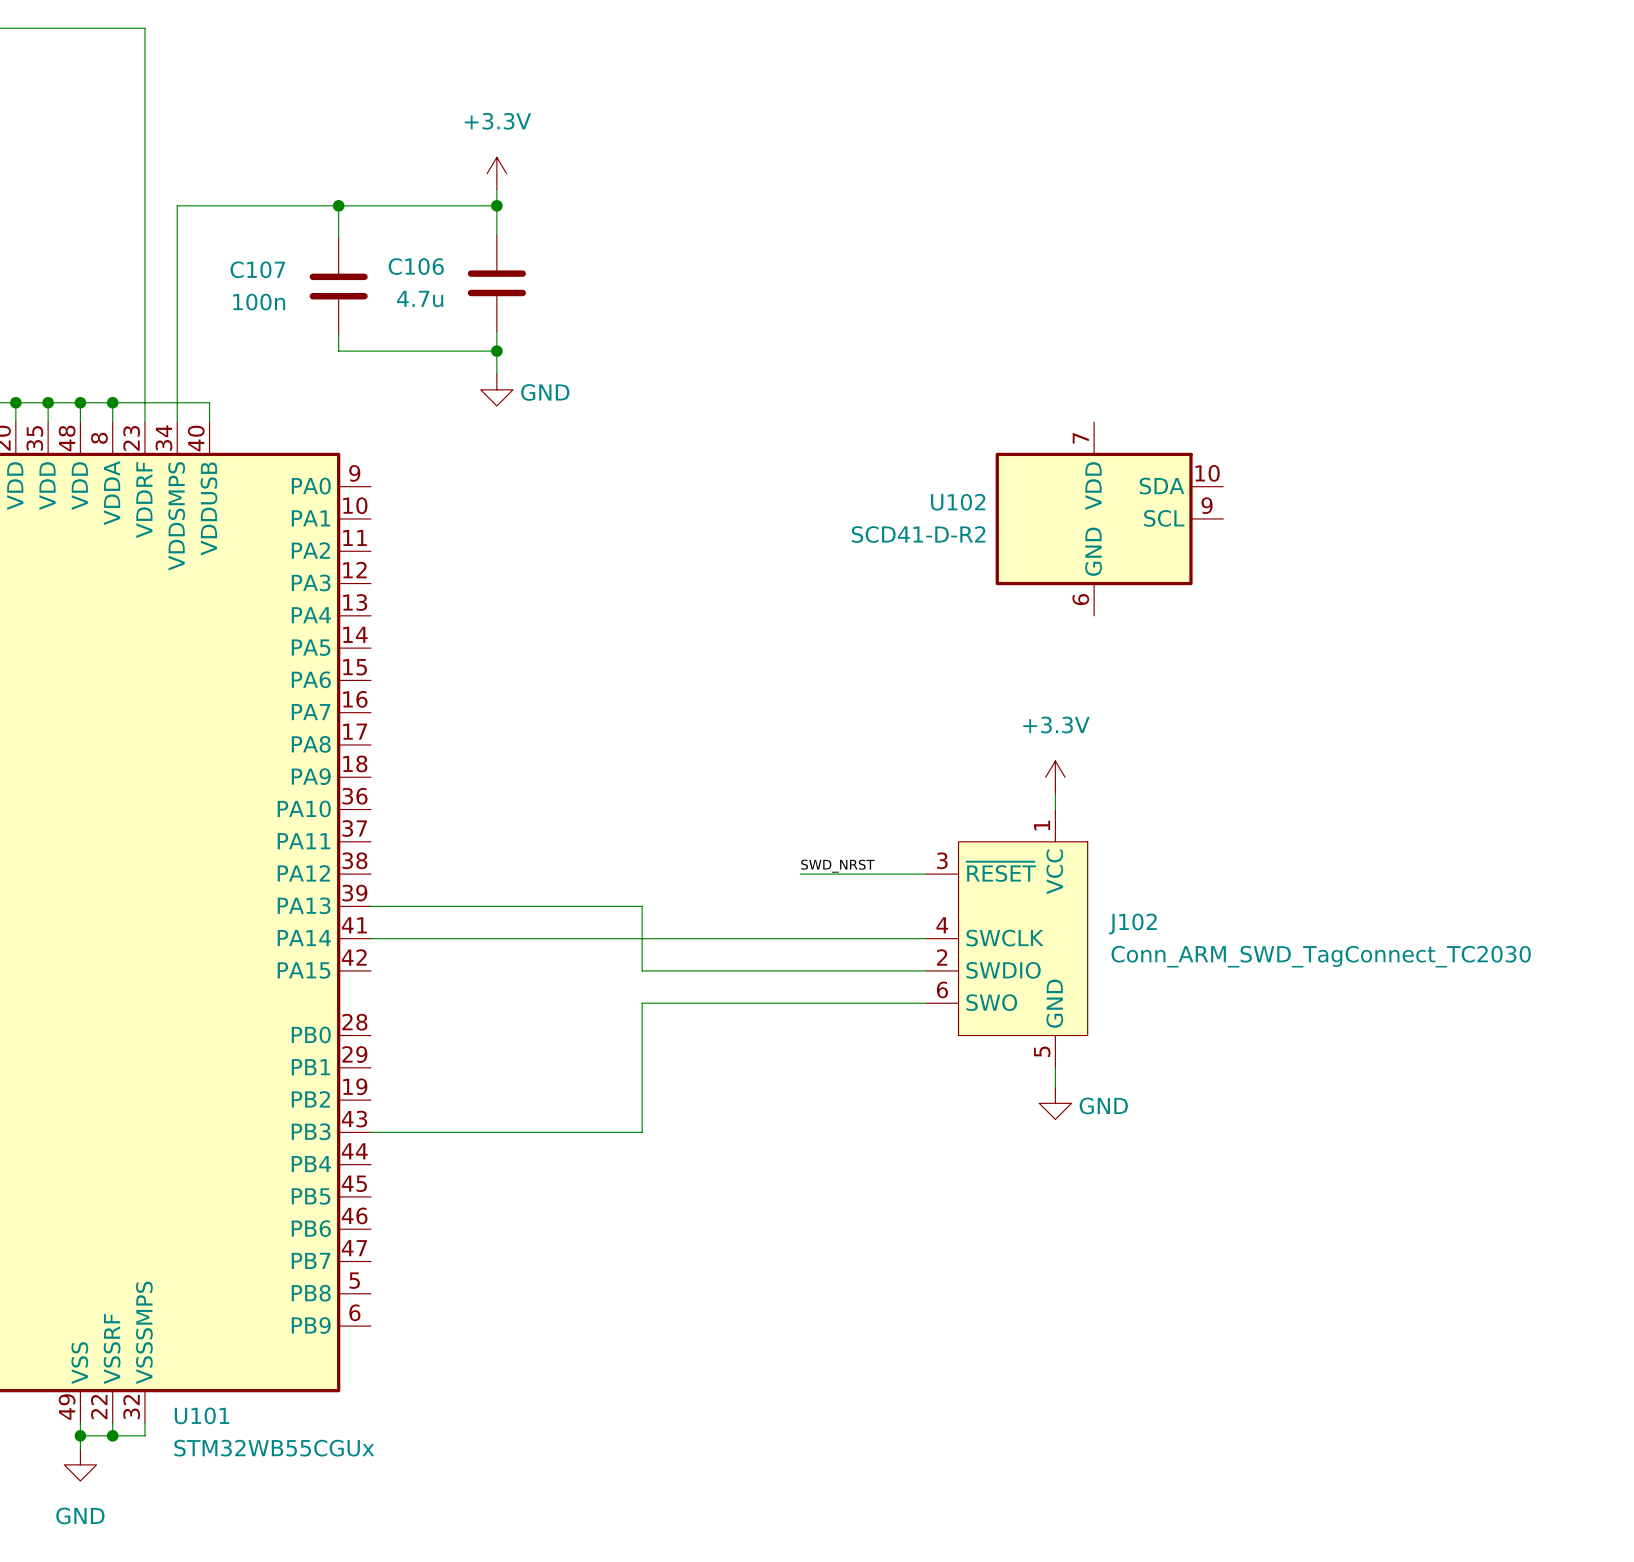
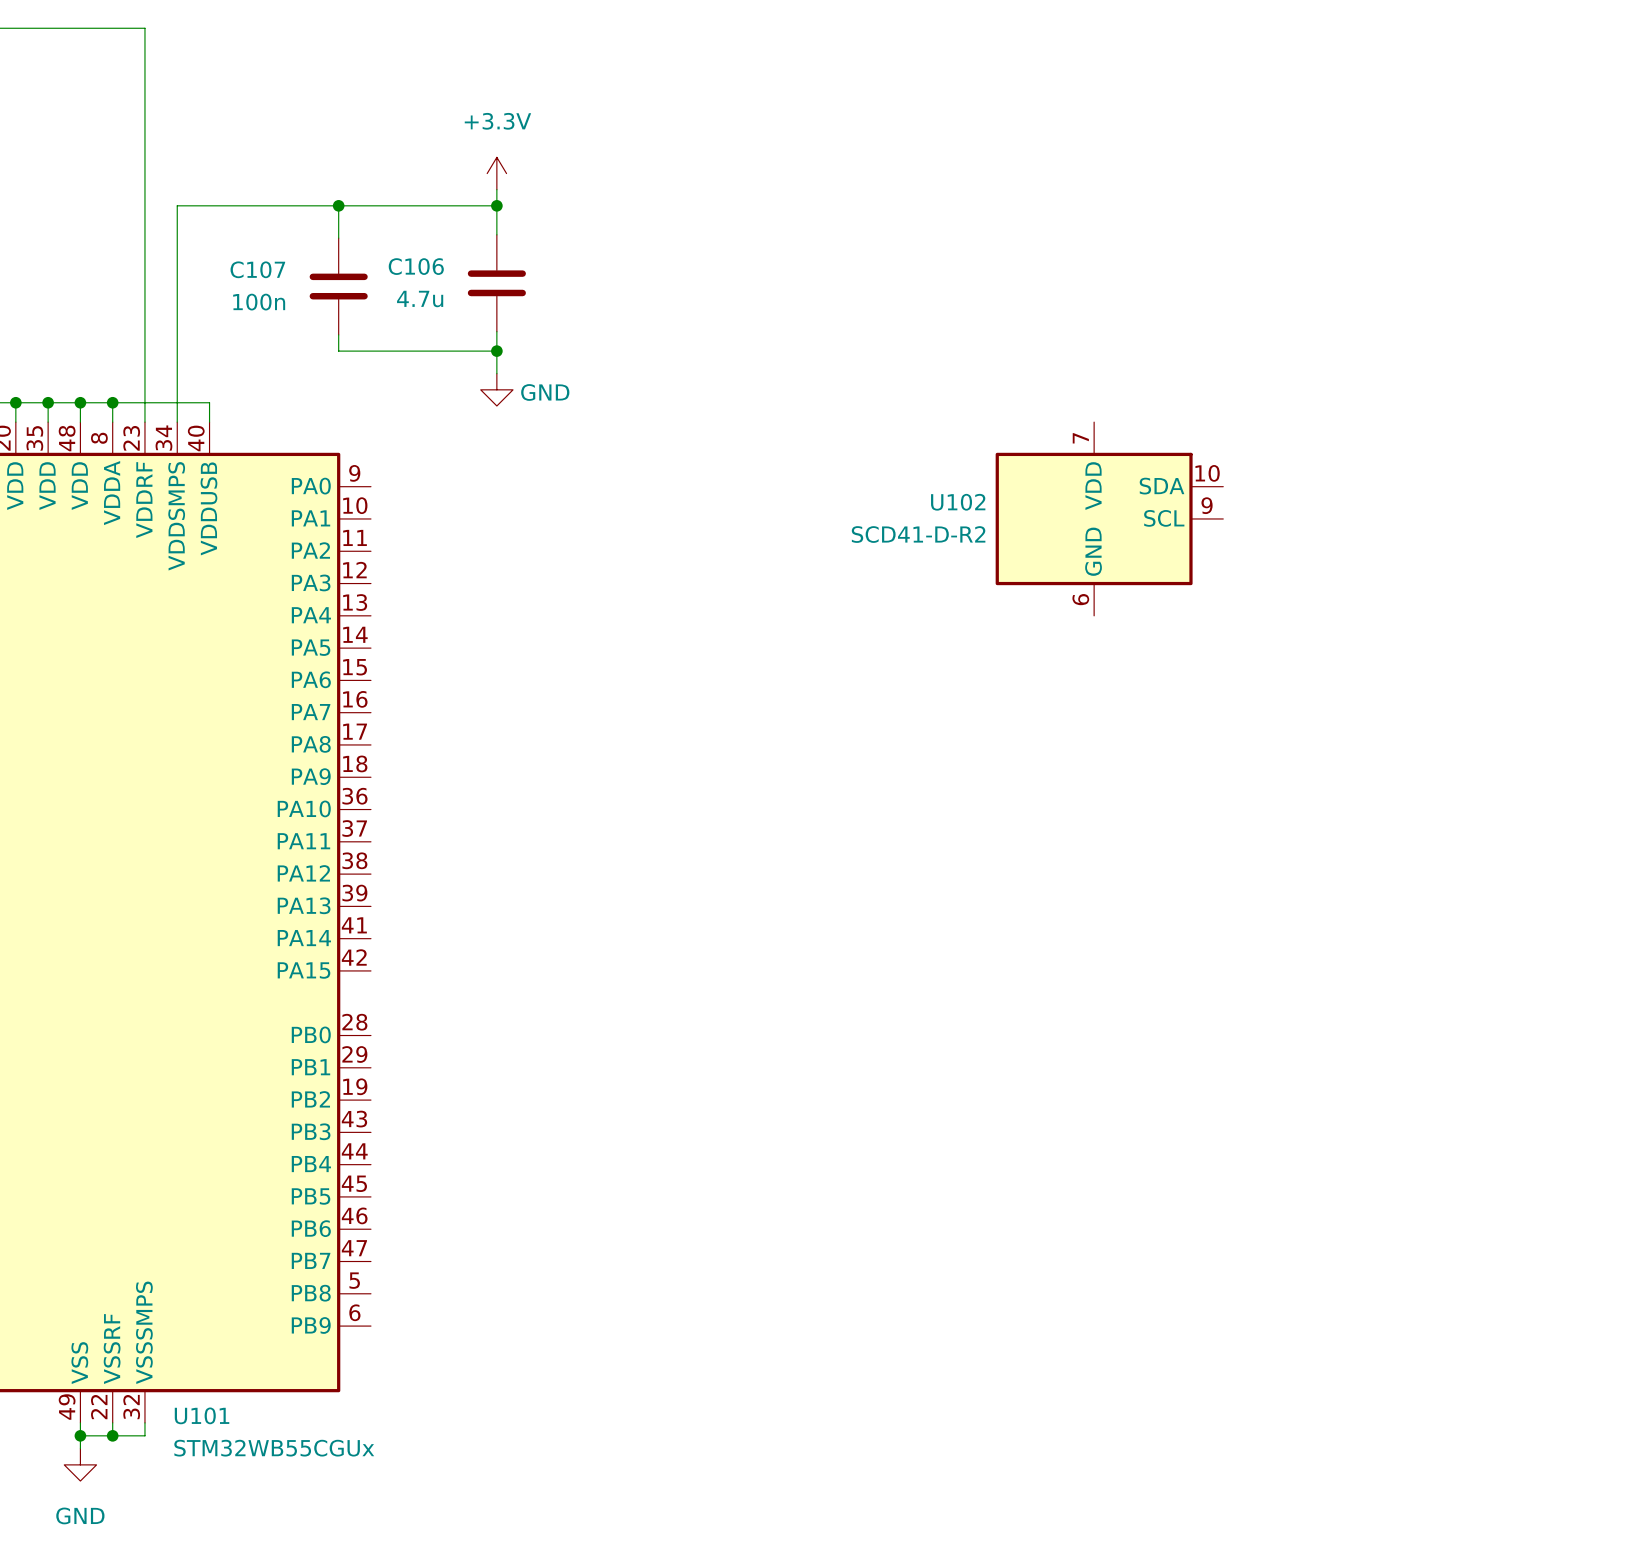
power symbol: +3.3V (1055, 777) -> none
wire: (1055, 793) (1055, 809) -> none
label: SWD_NRST (837, 866) -> none
wire: (800, 874) (926, 874) -> none
wire: (370, 906) (642, 906) (642, 970) (926, 970) -> none
wire: (370, 938) (926, 938) -> none
J102: Conn_ARM_SWD_TagConnect_TC2030 (1006, 938) -> none
wire: (926, 1003) (642, 1003) (642, 1132) (370, 1132) -> none
wire: (1055, 1067) (1055, 1087) -> none
power symbol: GND (1055, 1103) -> none

